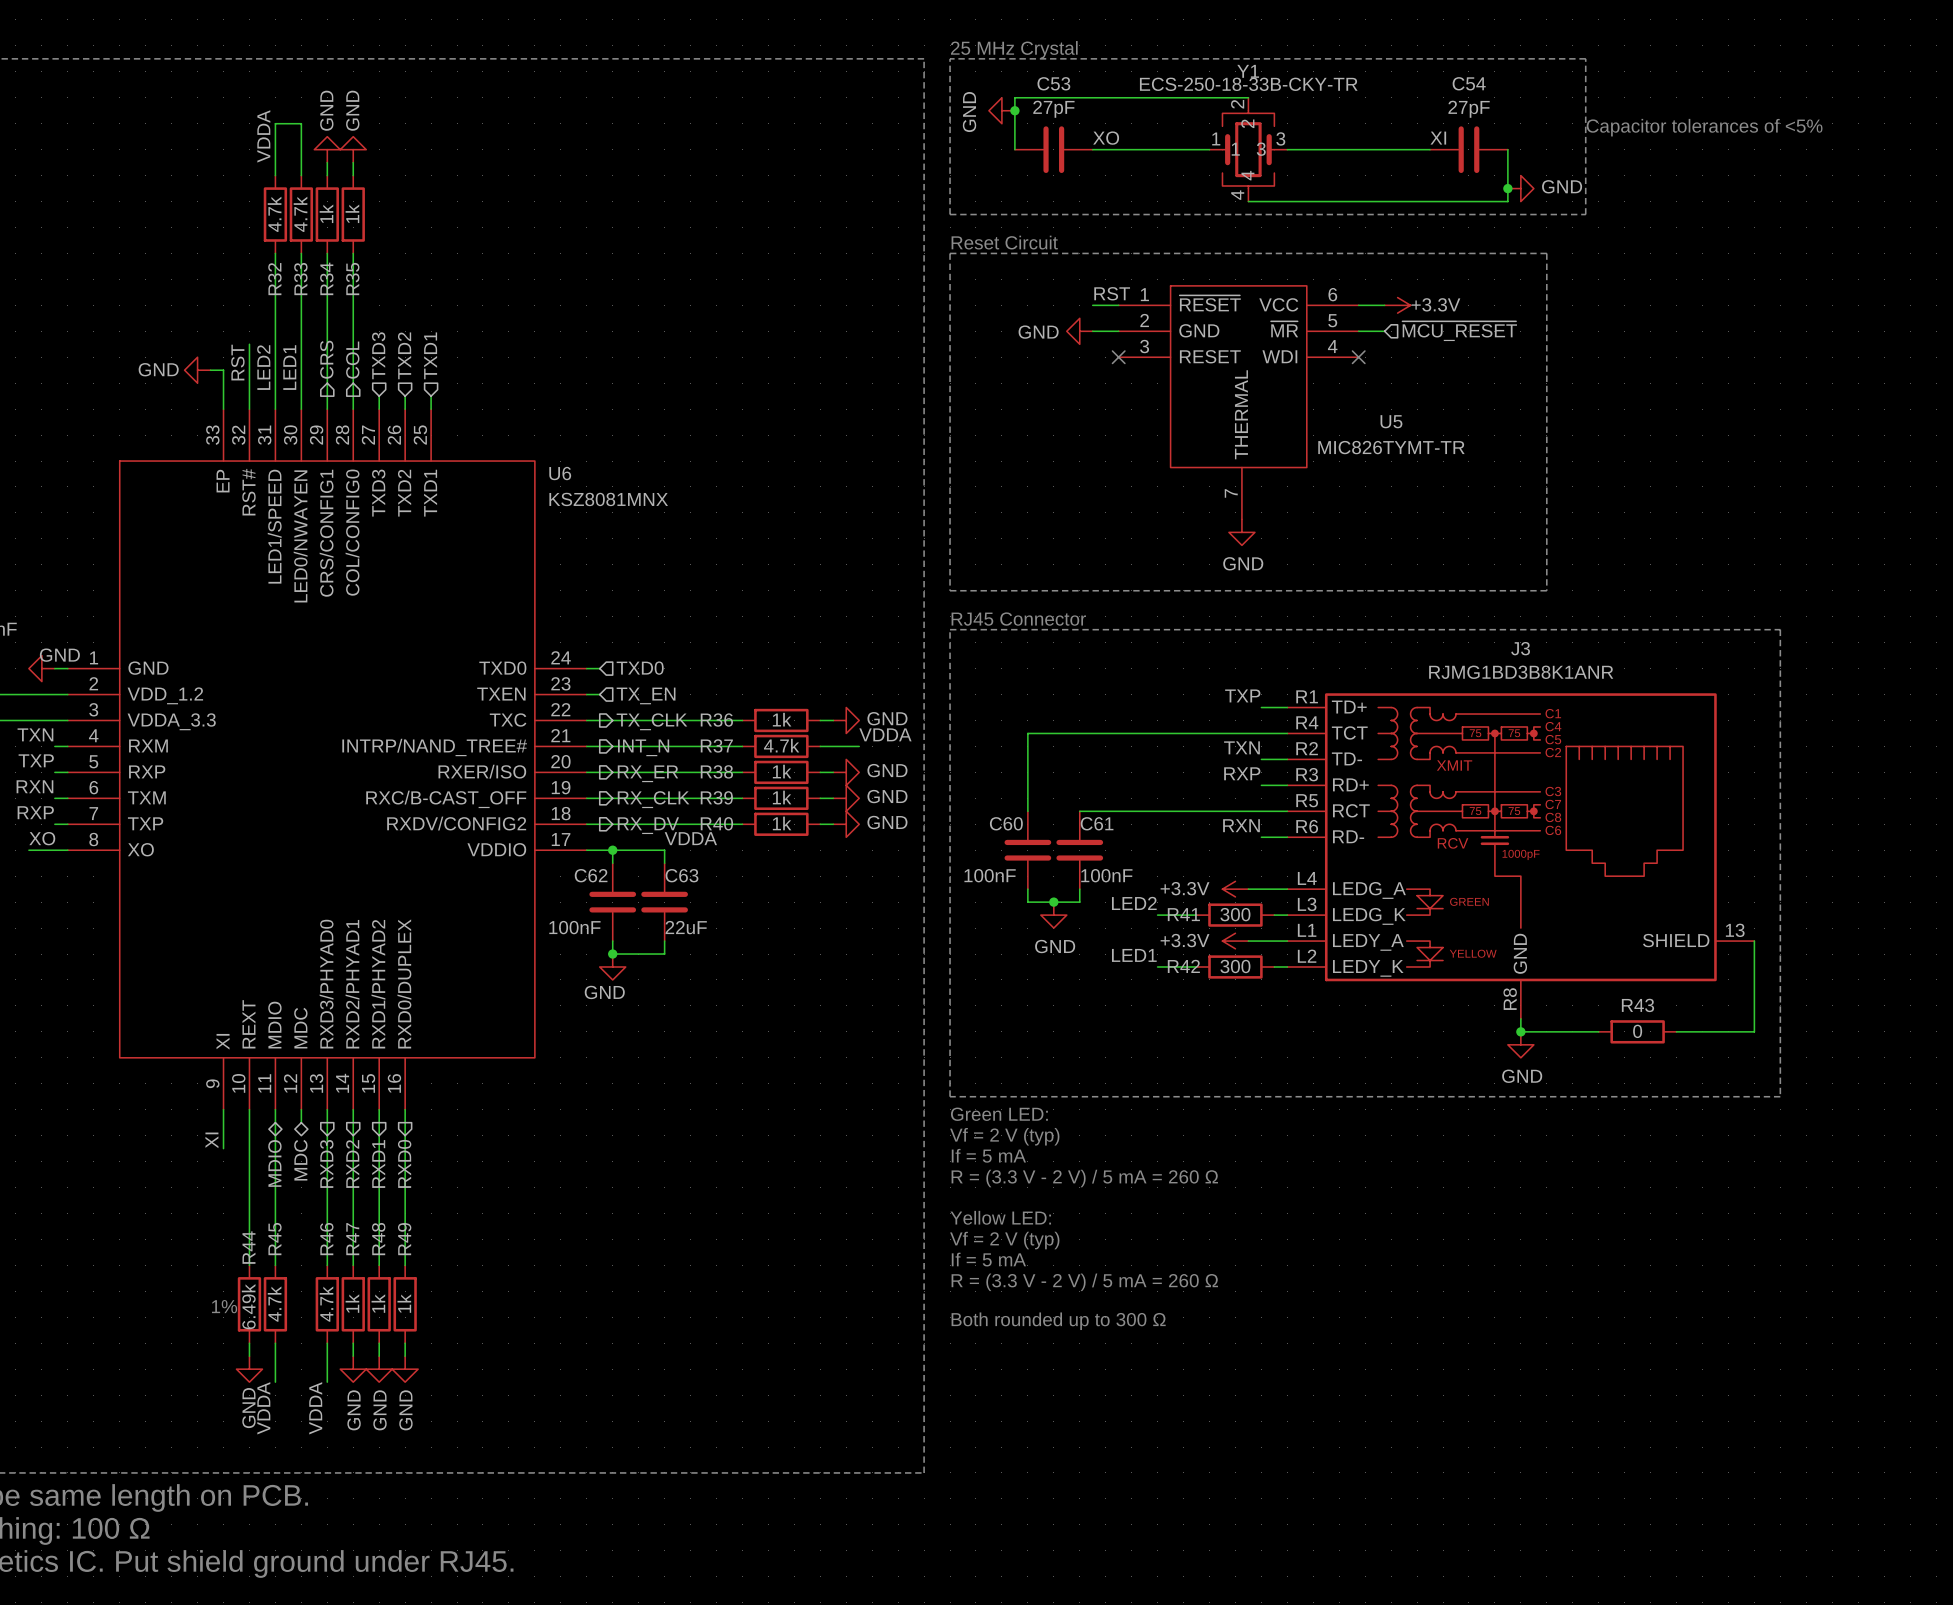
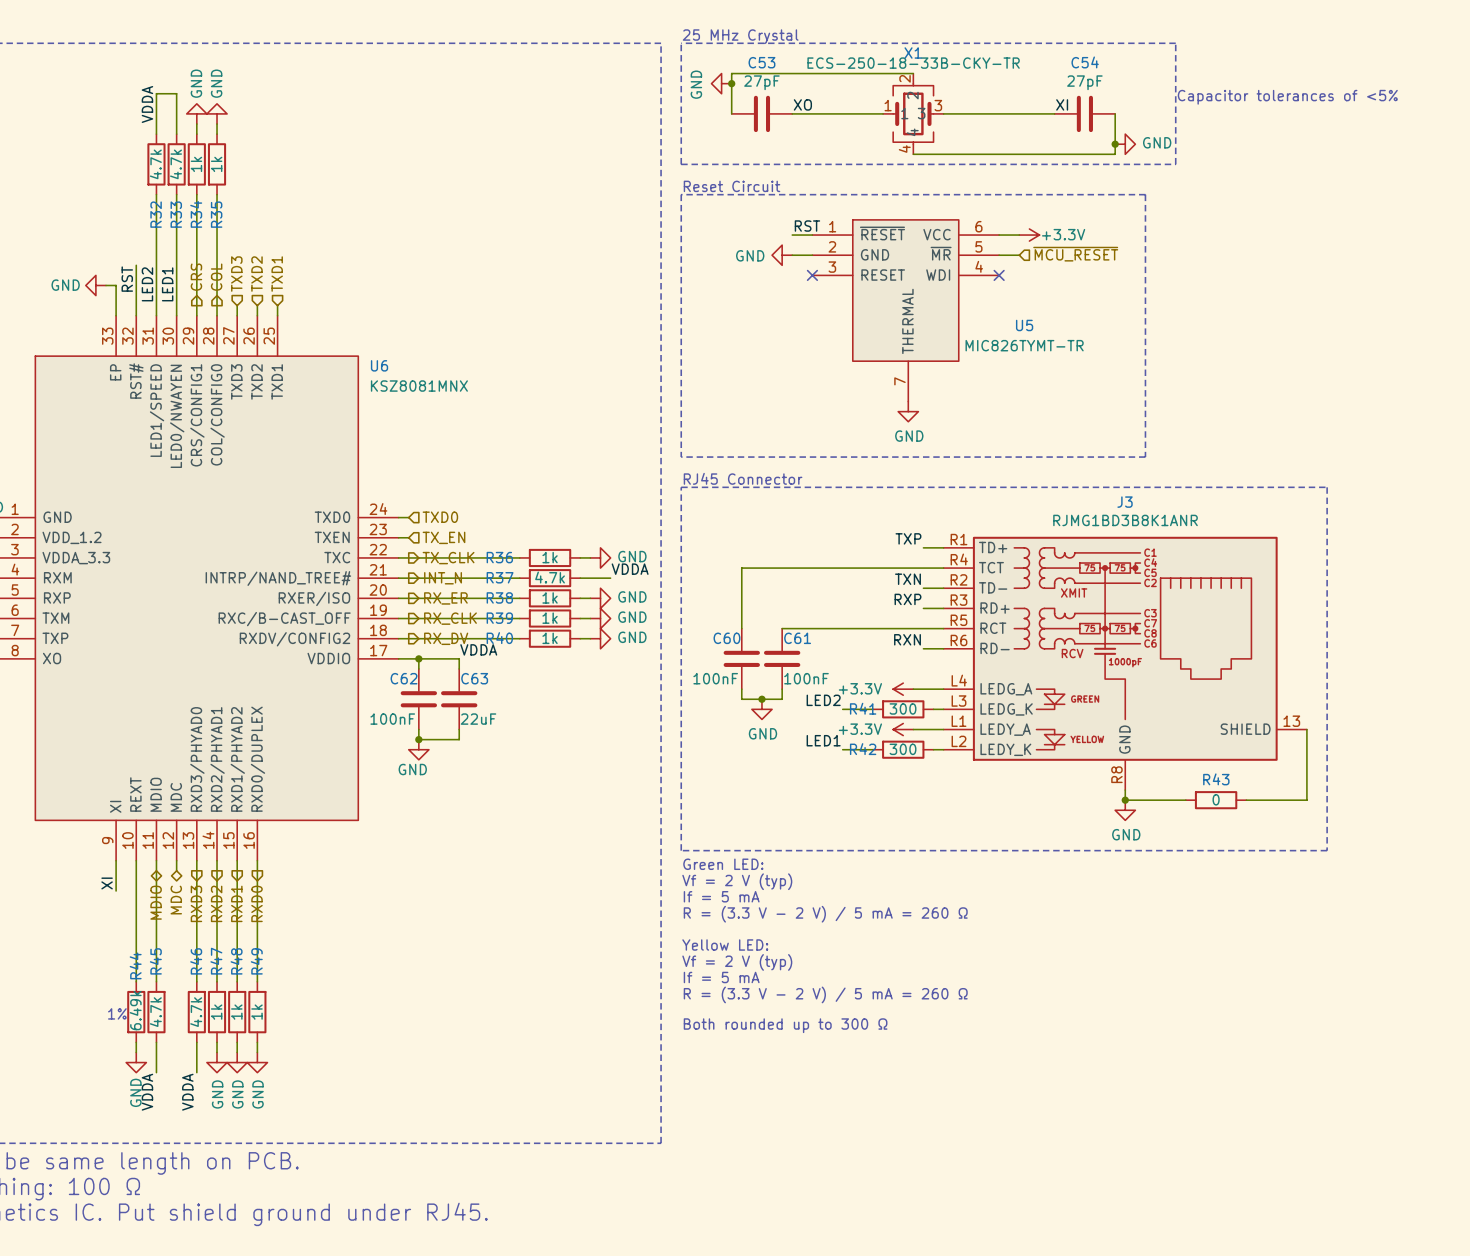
Y1 name: Y1 (1248, 71) -> X1 (913, 53)

